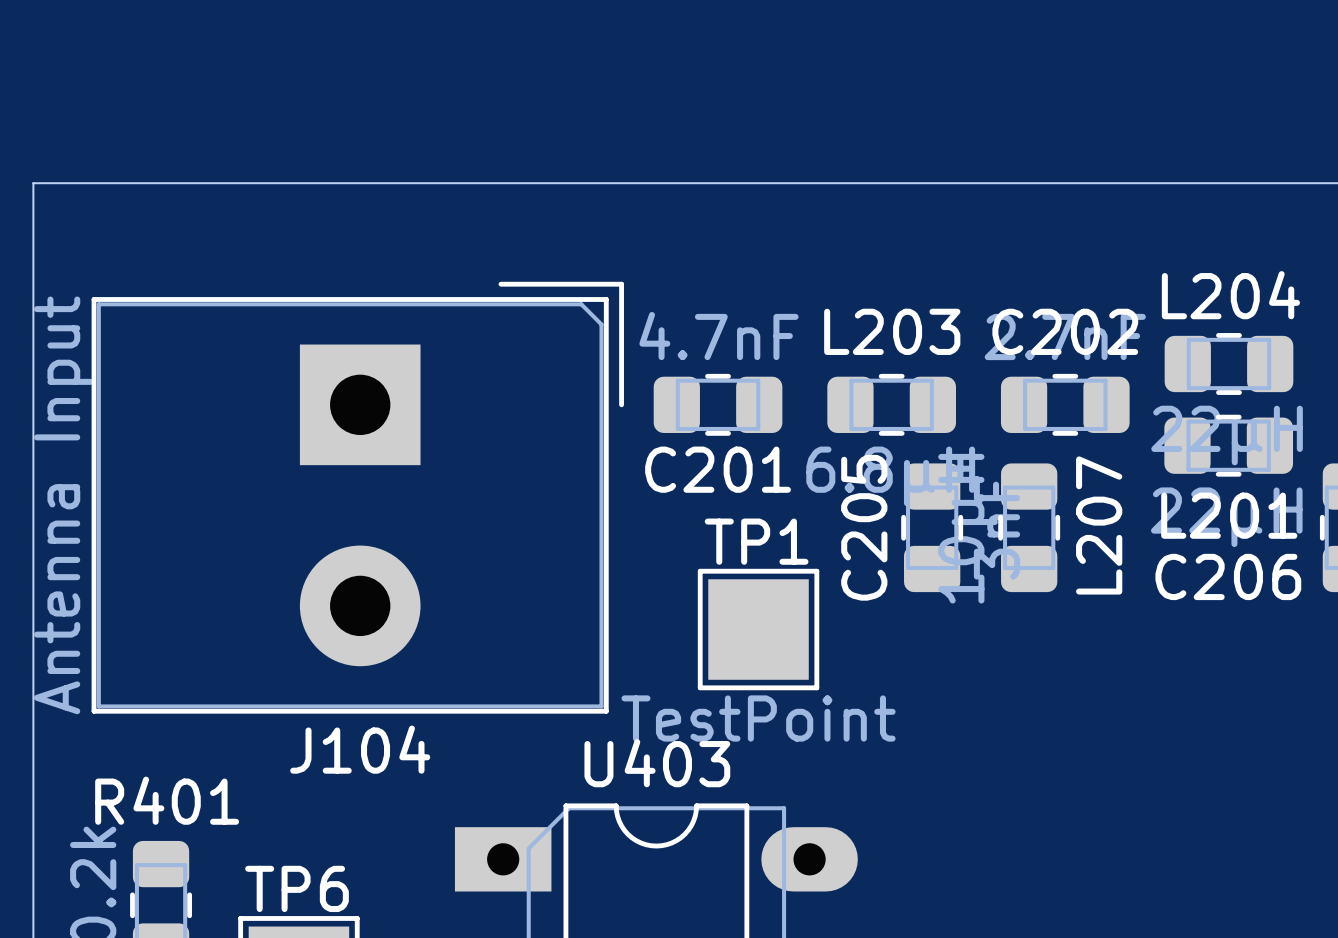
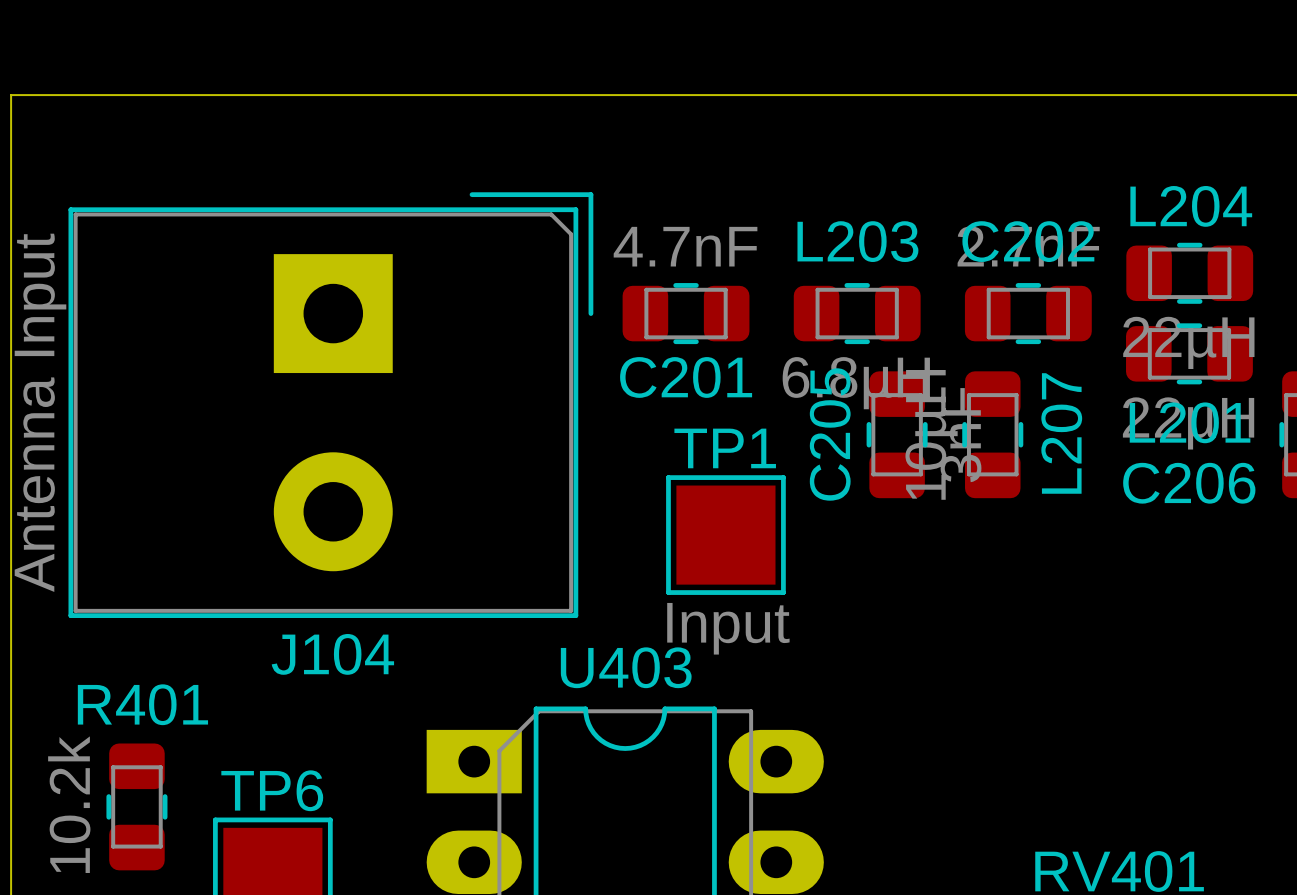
TP1 value: TestPoint (758, 718) -> Input (728, 628)

